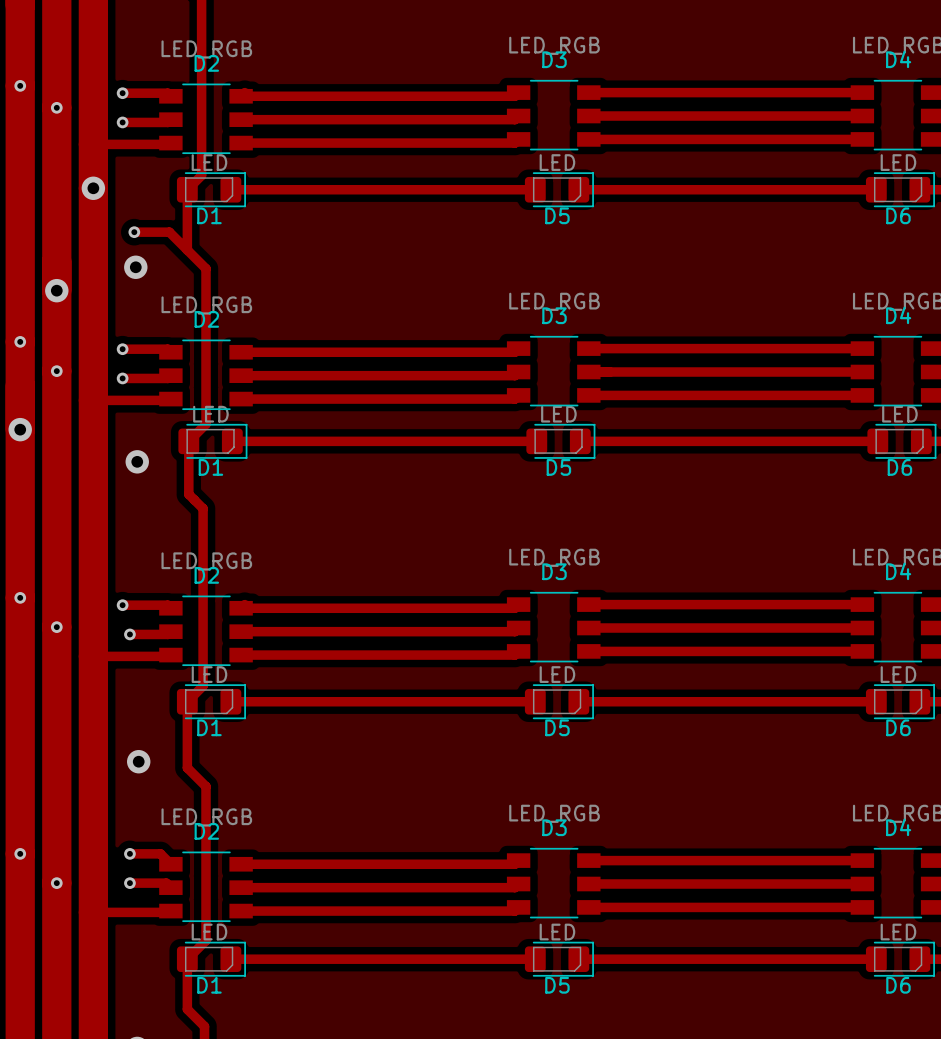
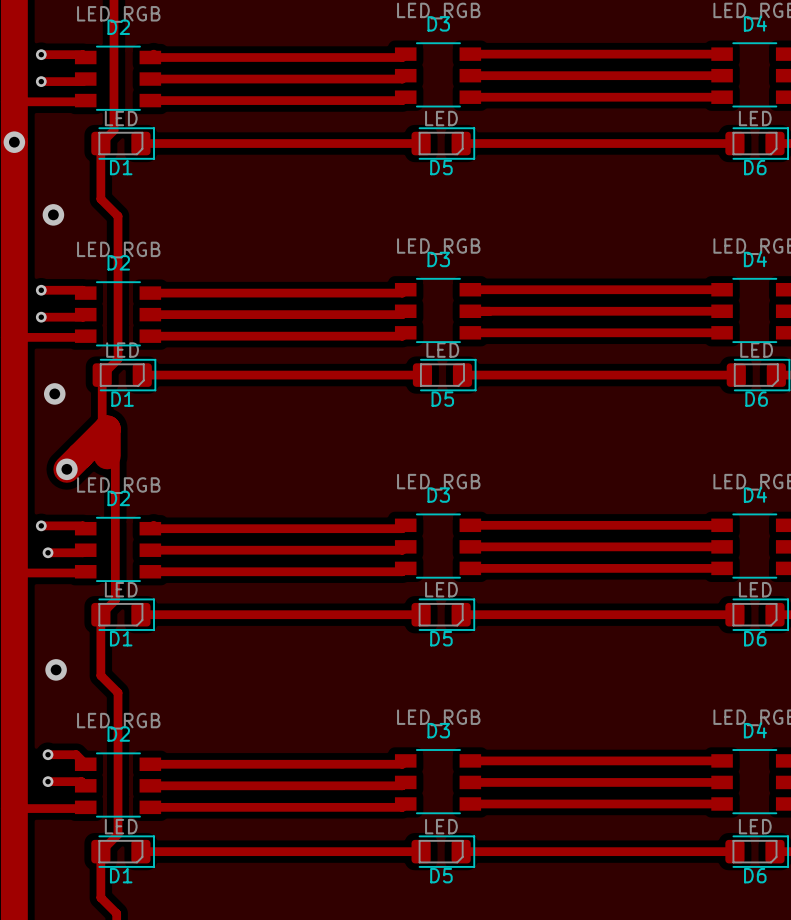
track: (134, 232) (169, 232) (187, 250) -> none
via: (134, 232) -> none
track: none -> (107, 455) (107, 428) (66, 469)
via: none -> (66, 469)

